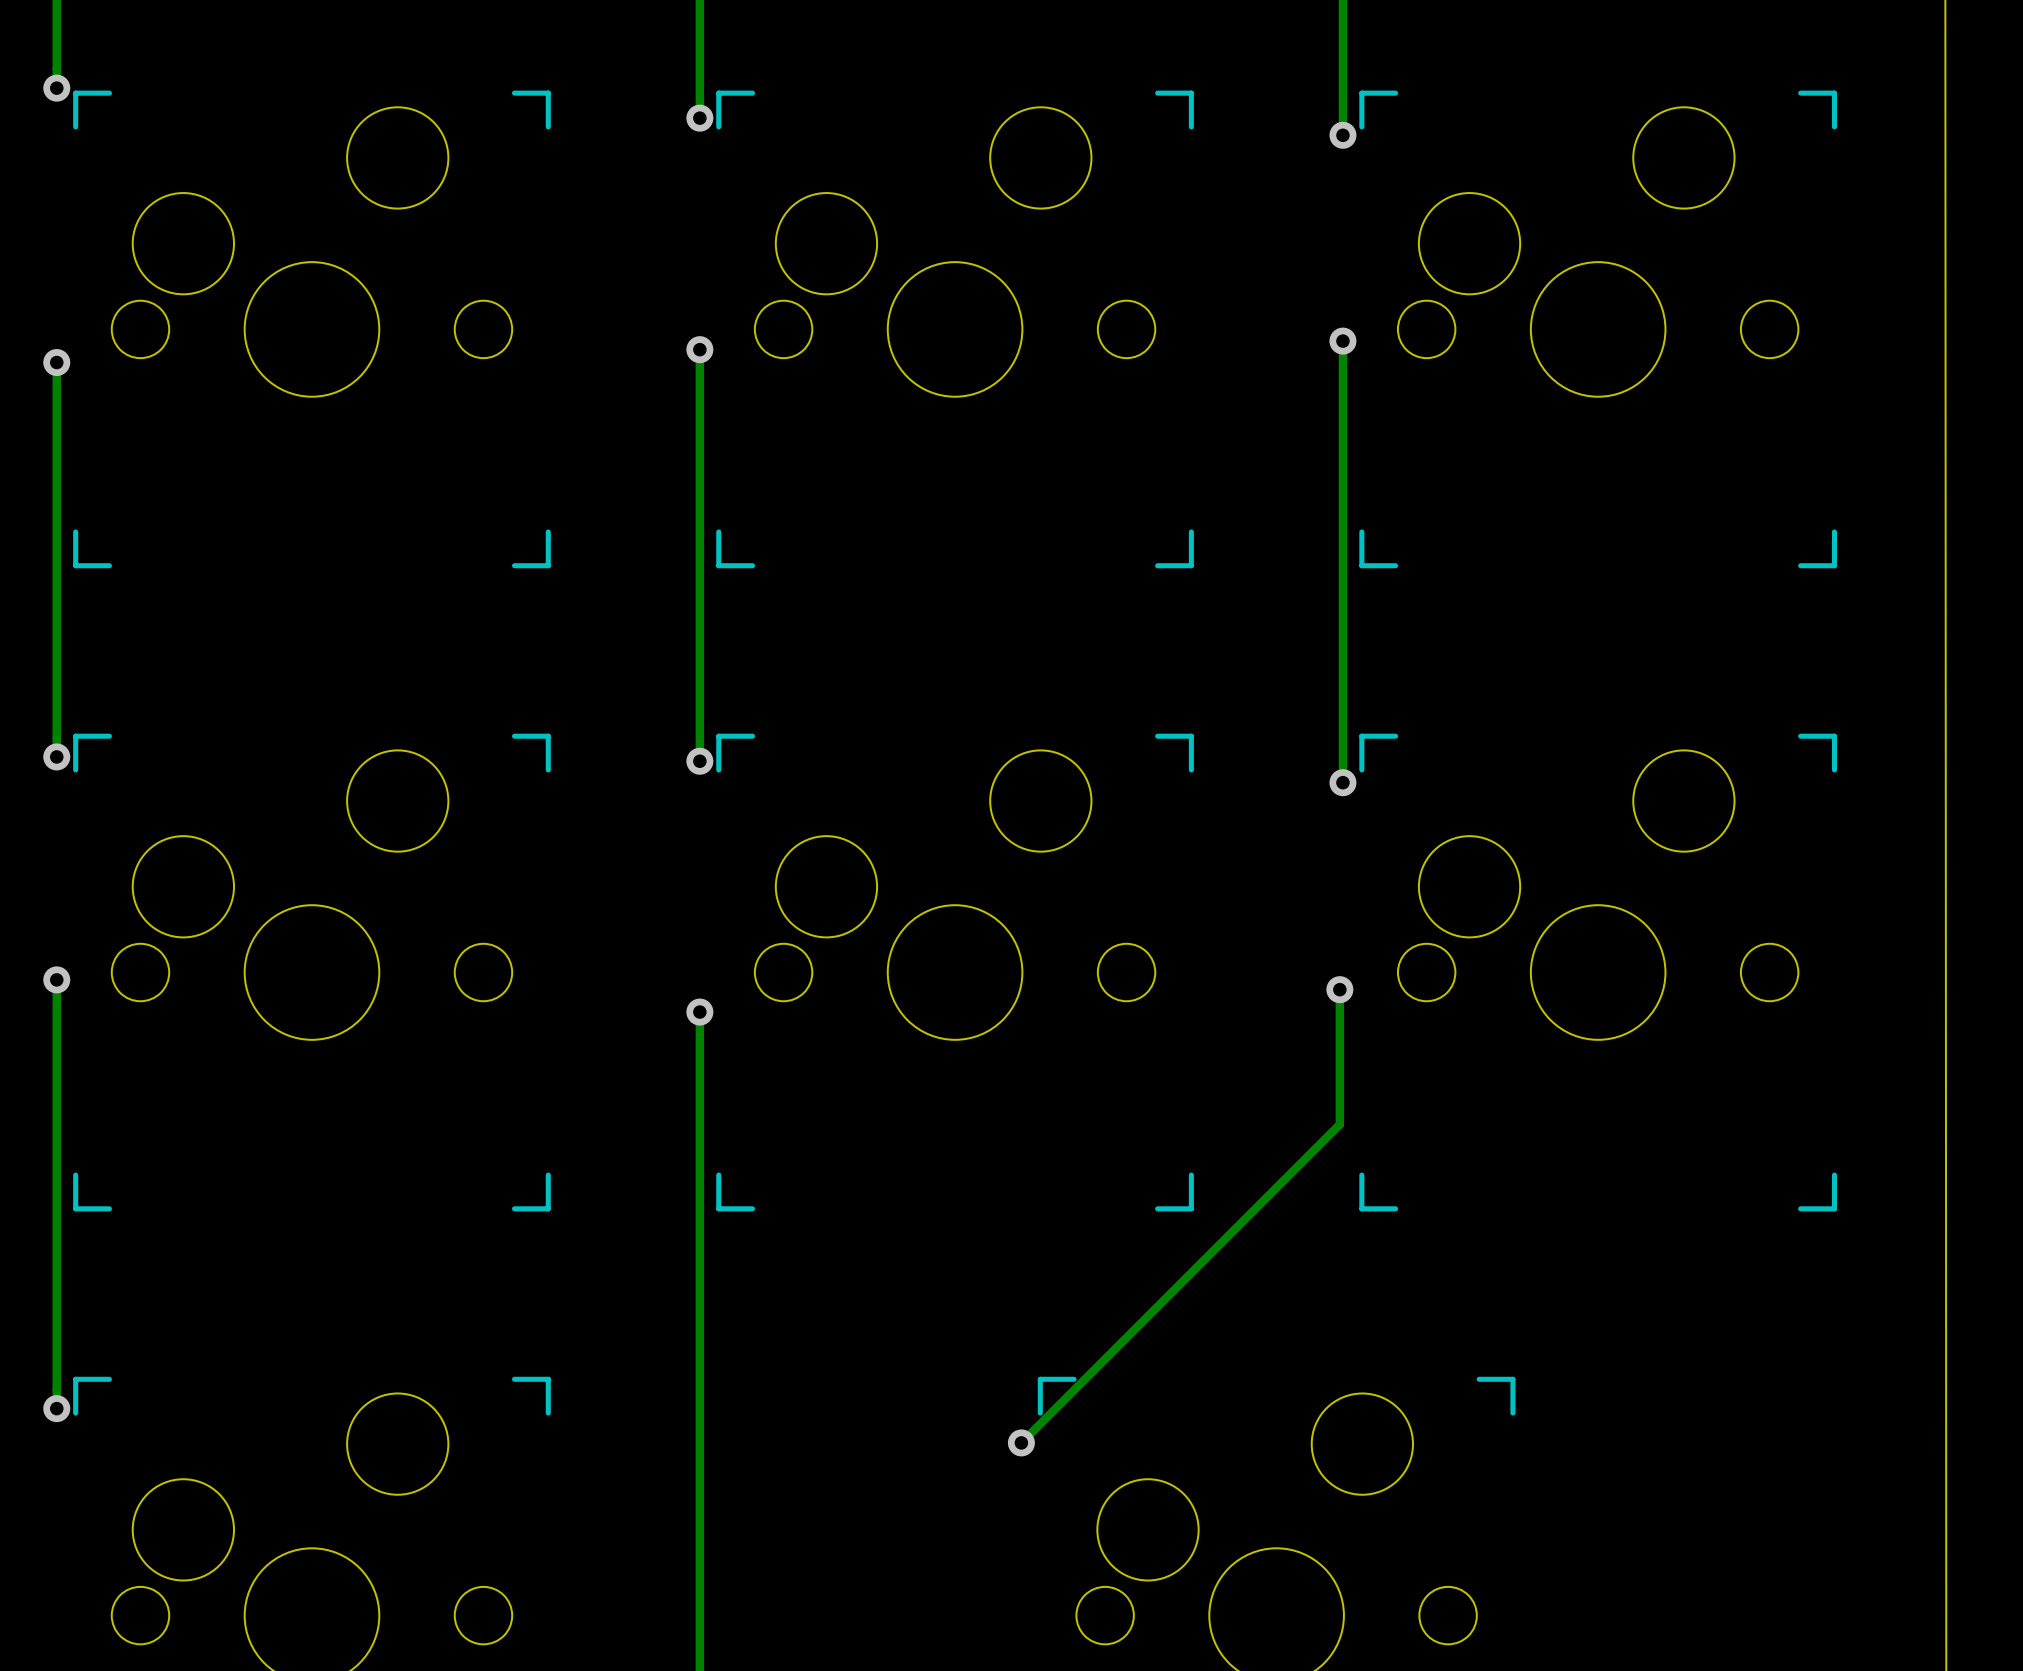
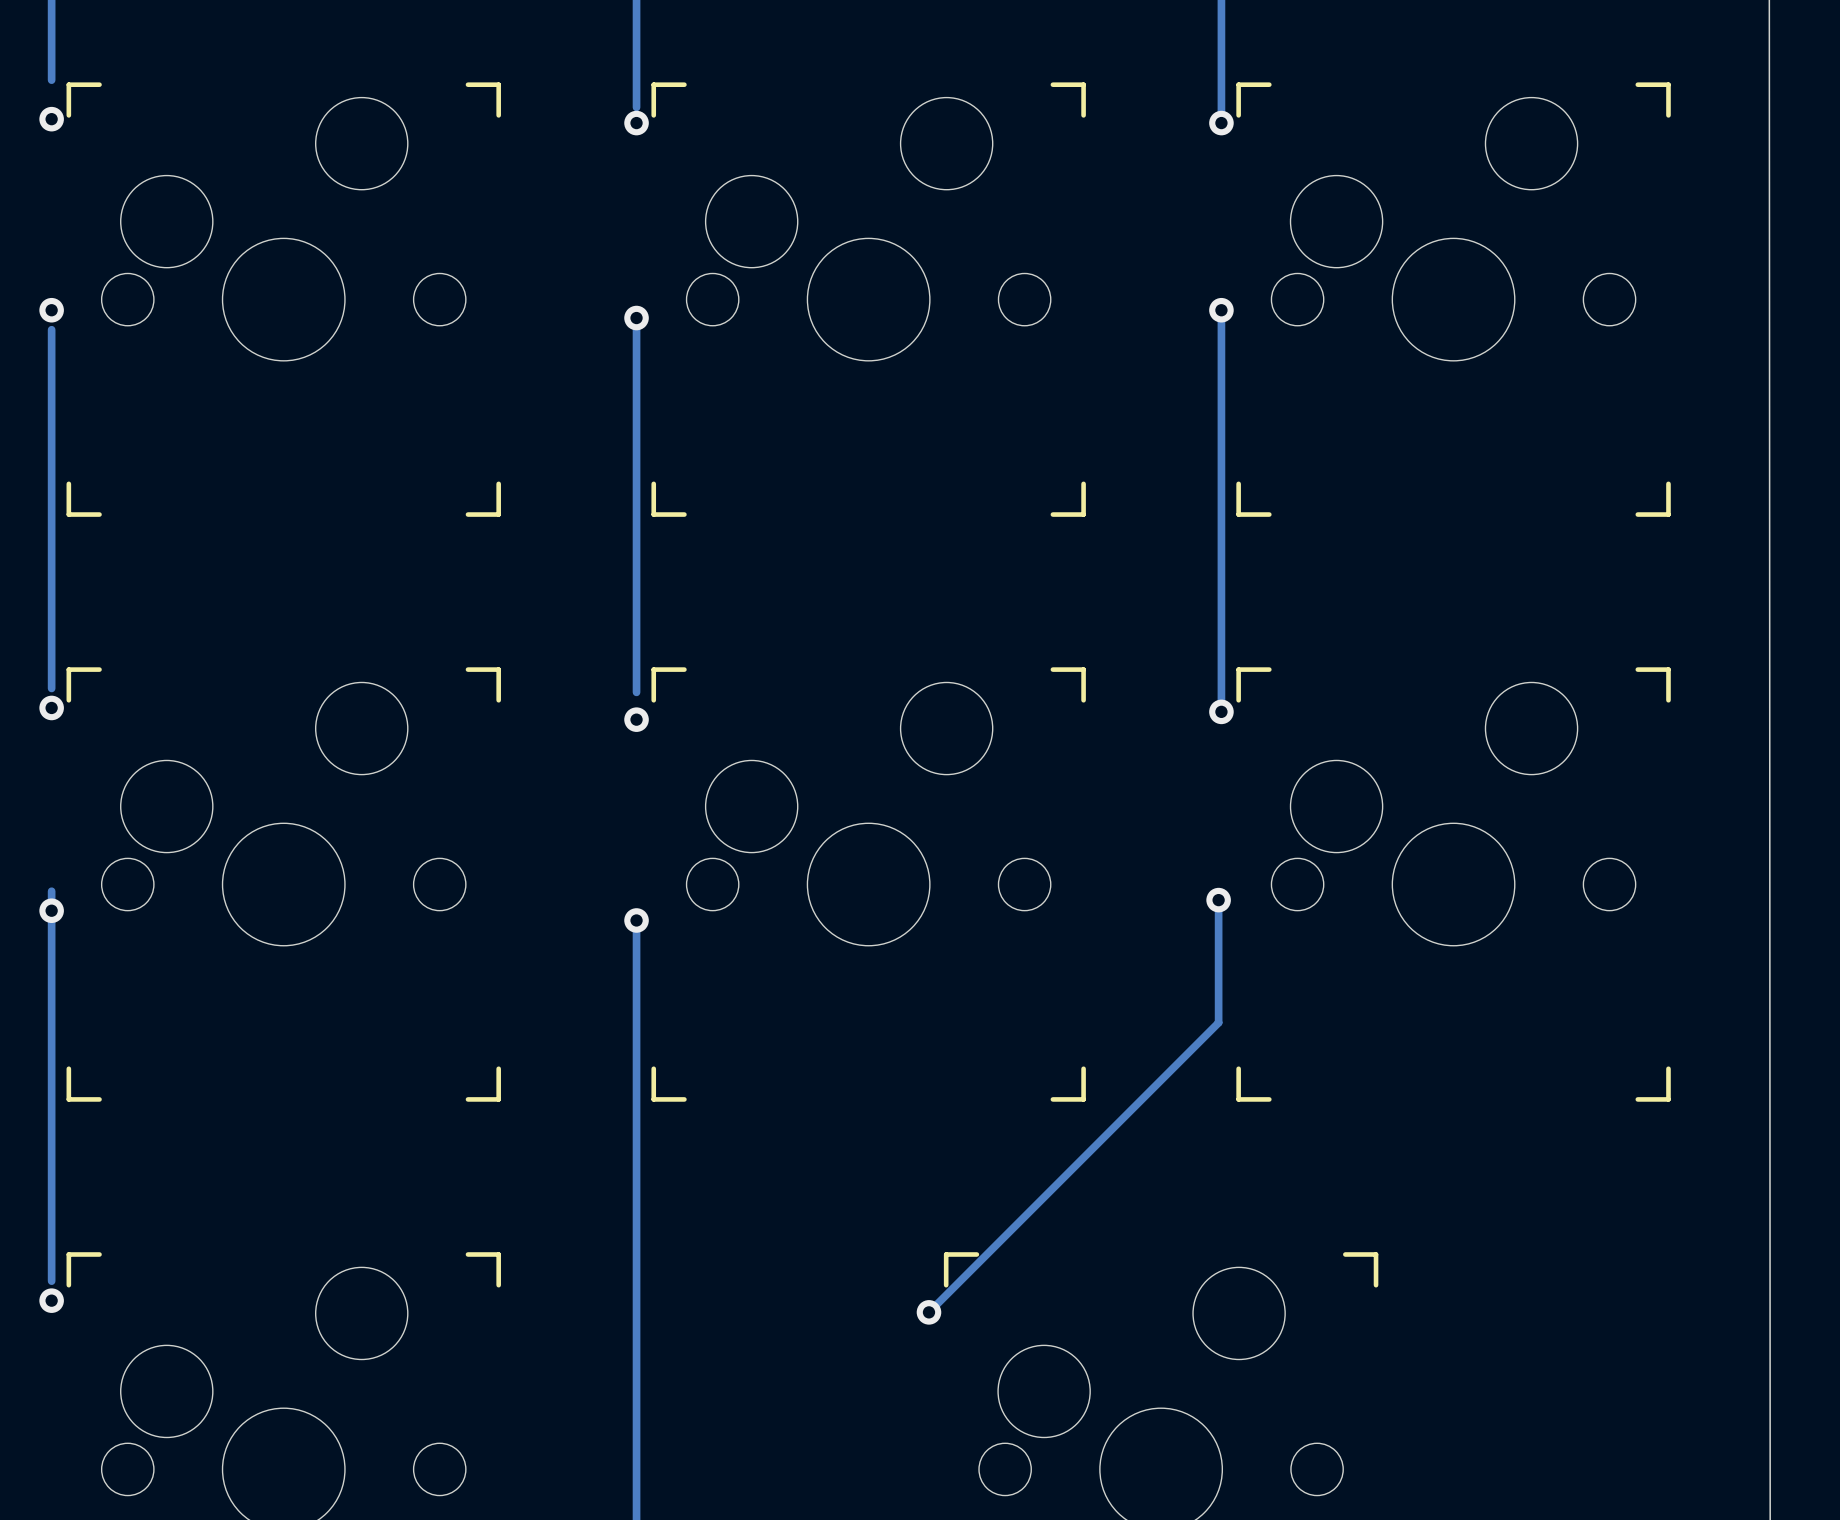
via position: (56, 88) -> (51, 119)
via position: (699, 118) -> (636, 123)
via position: (56, 362) -> (51, 310)
via position: (56, 756) -> (51, 707)
via position: (699, 761) -> (636, 719)
via position: (56, 979) -> (51, 910)
via position: (56, 1408) -> (51, 1300)

